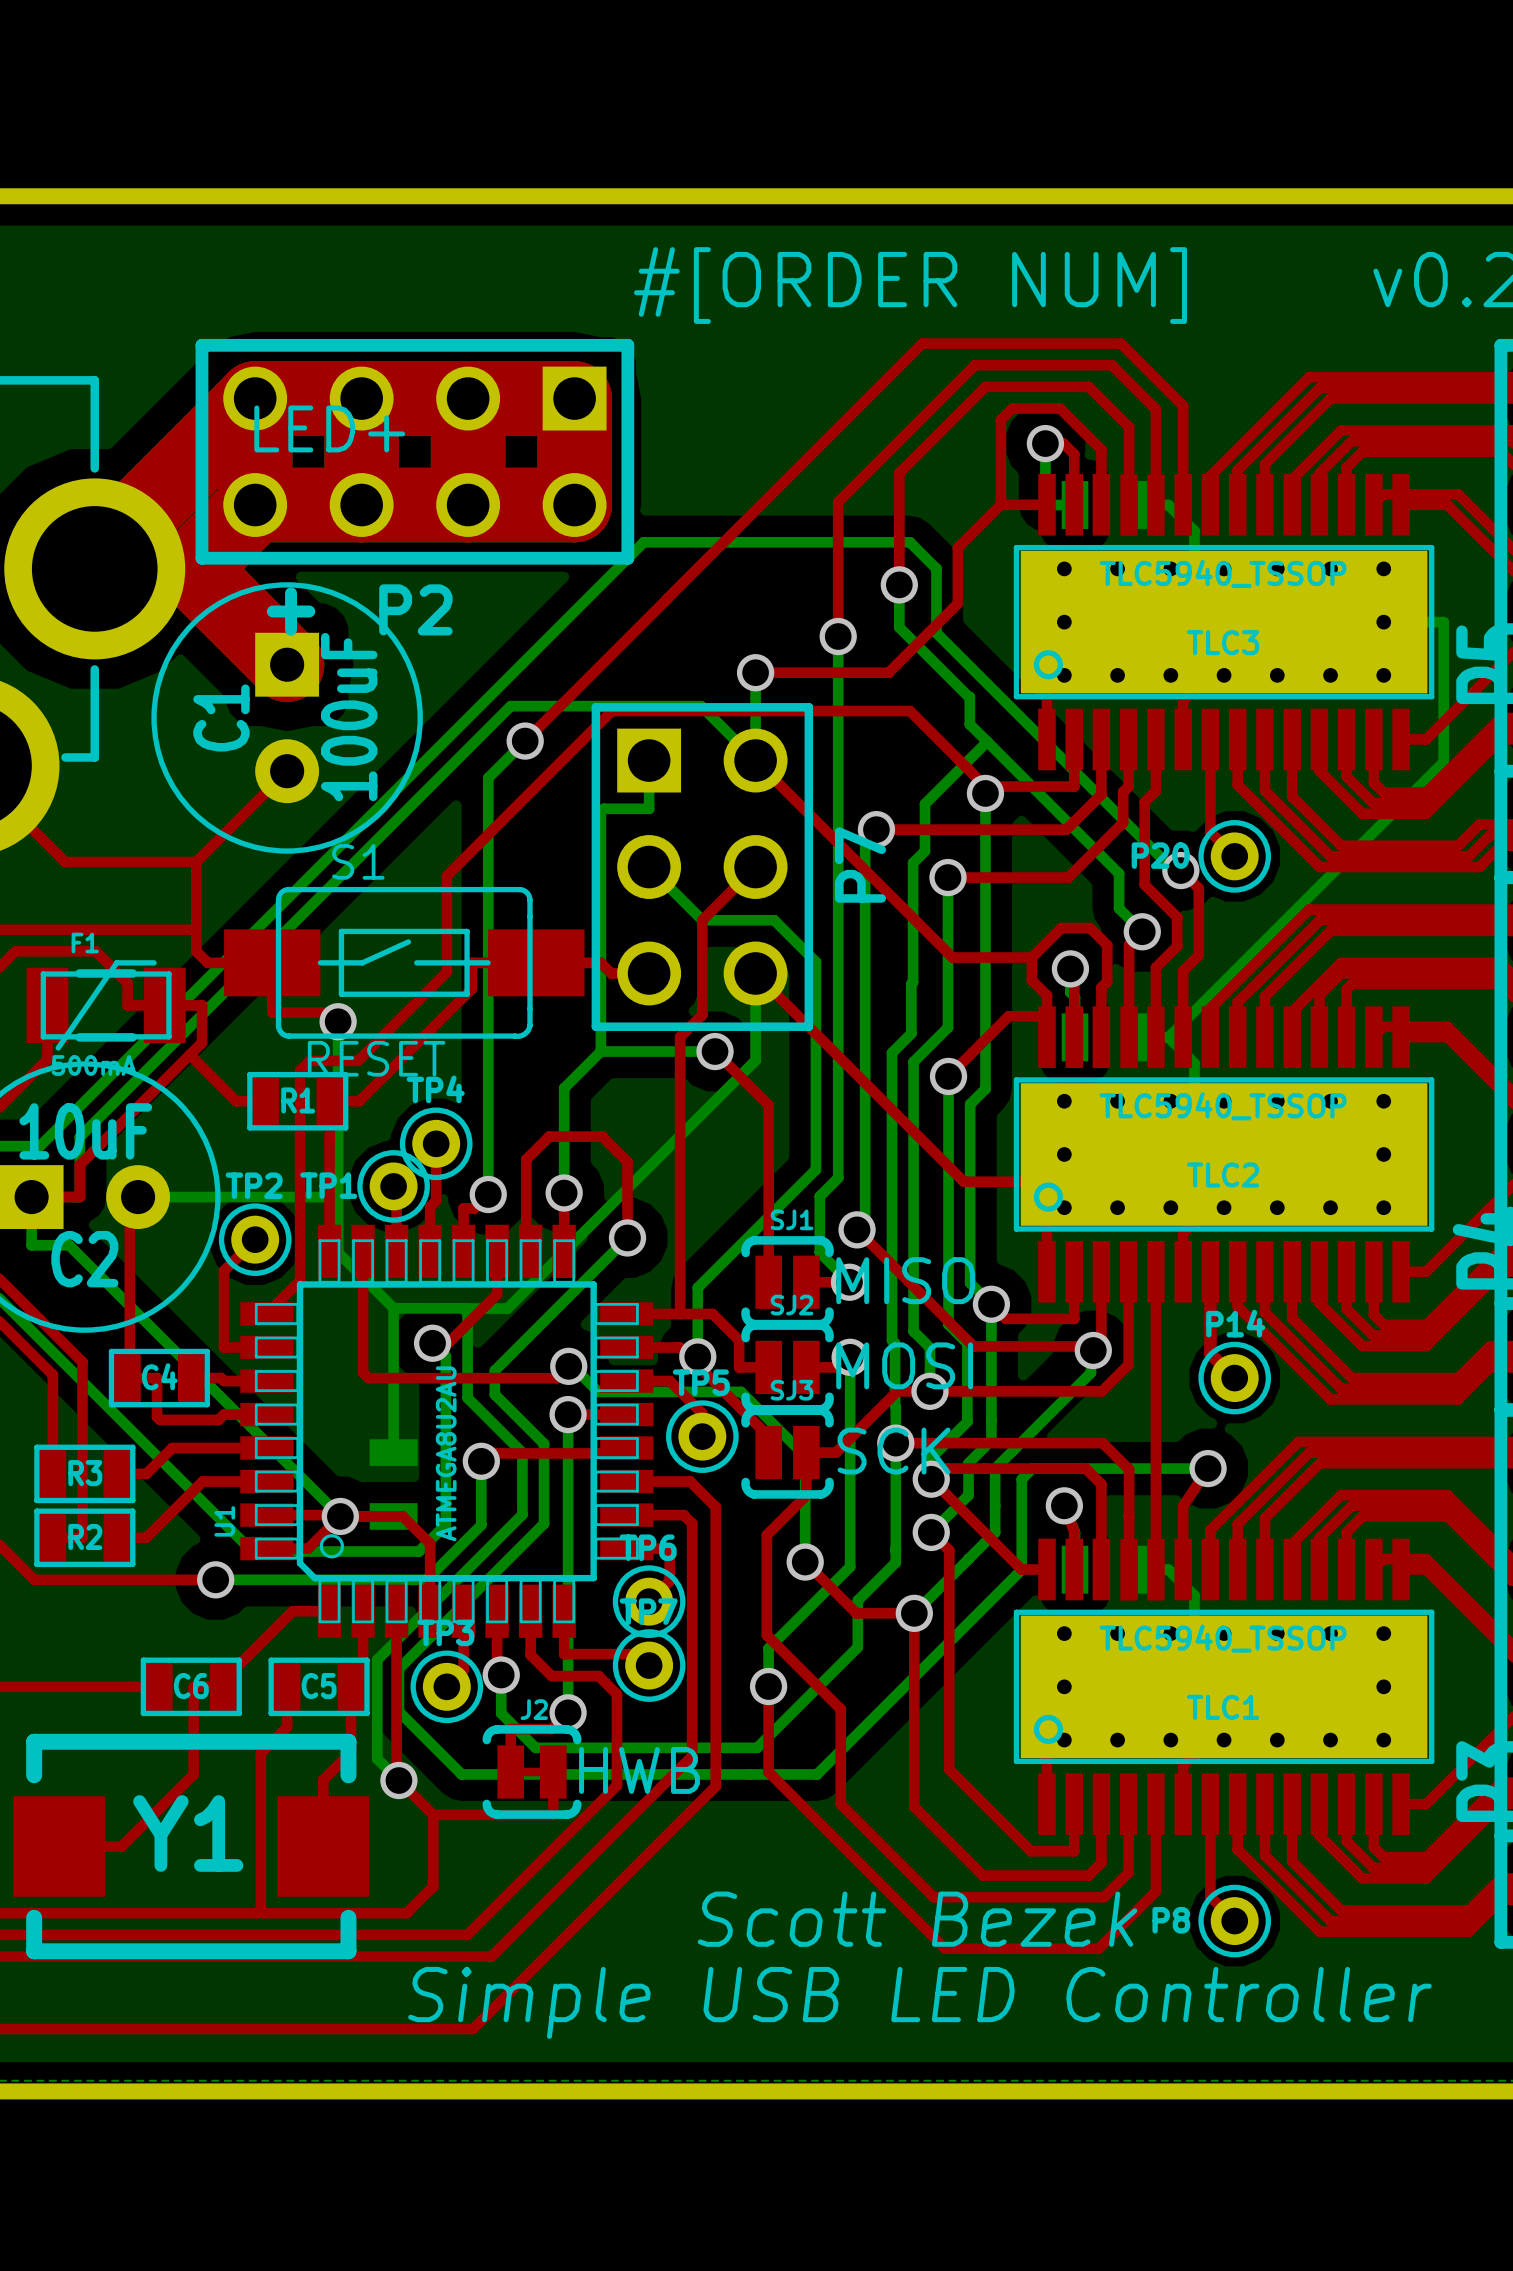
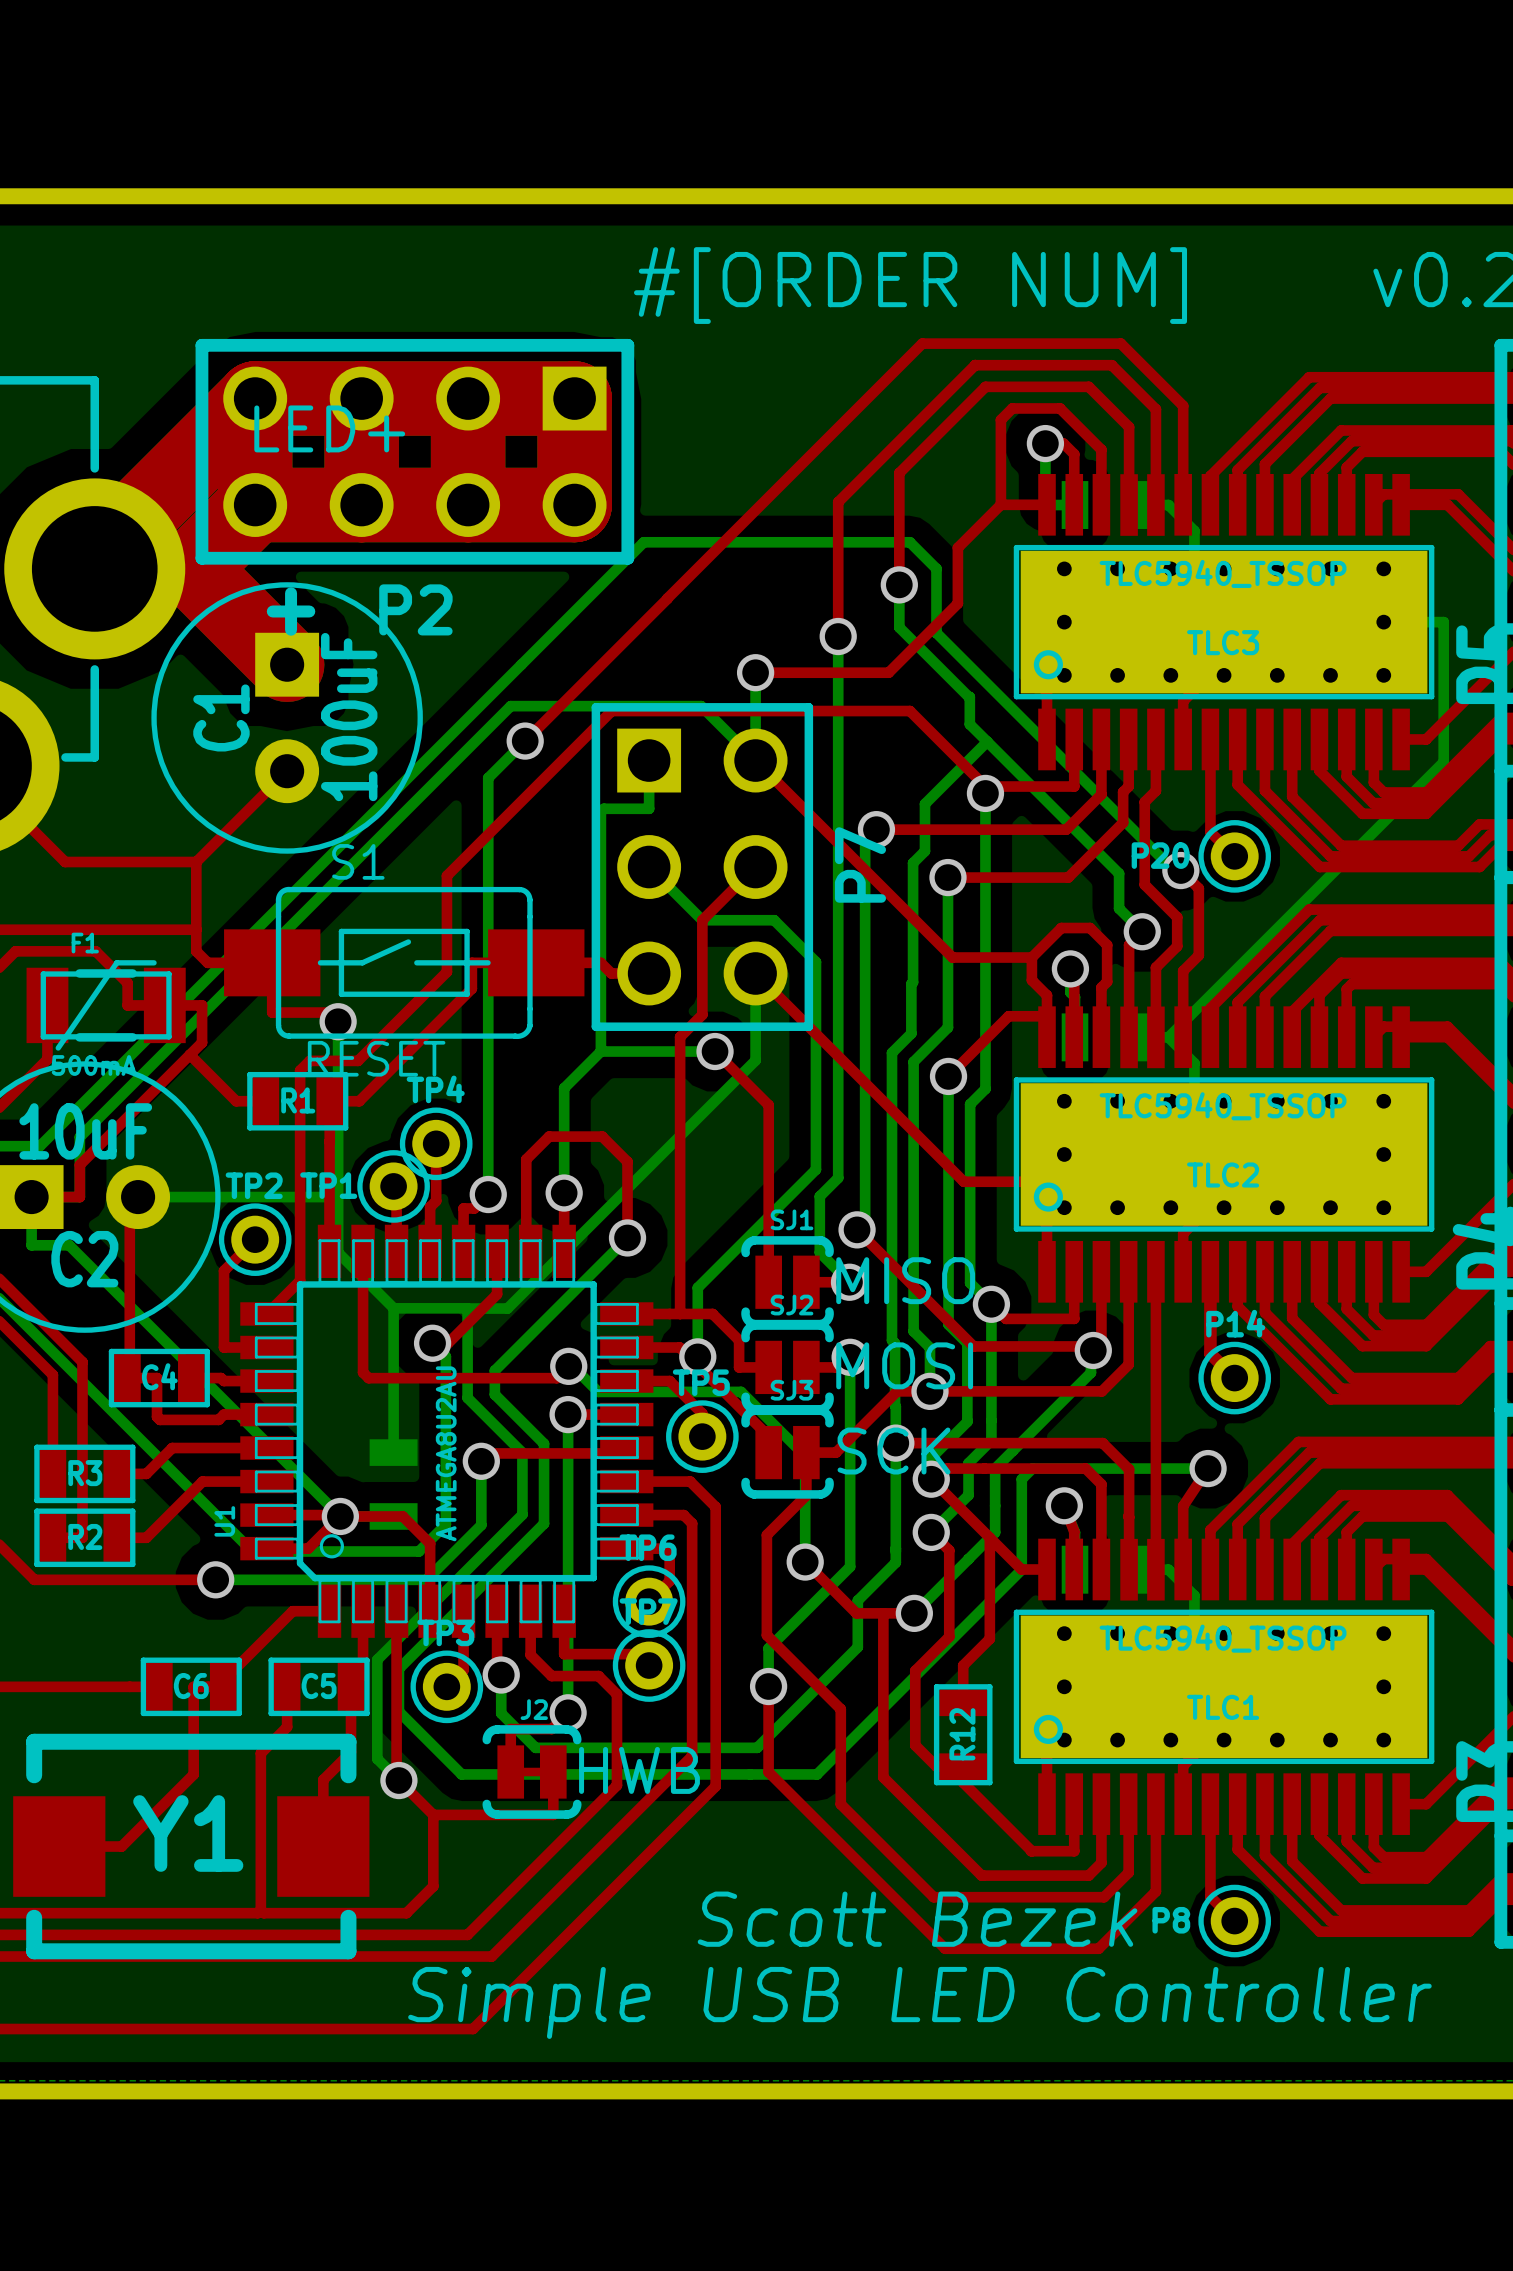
top track: none -> (989, 1537) (989, 1638) (963, 1665) (963, 1702)
top track: (914, 1613) (914, 1806) (983, 1875) -> (883, 1613) (883, 1777) (983, 1875)
top track: (949, 1636) (949, 1769) (1030, 1851) -> (949, 1636) (915, 1670) (915, 1745) (936, 1766) (963, 1766) (963, 1782) (1031, 1851)
R12: none -> (963, 1734)

